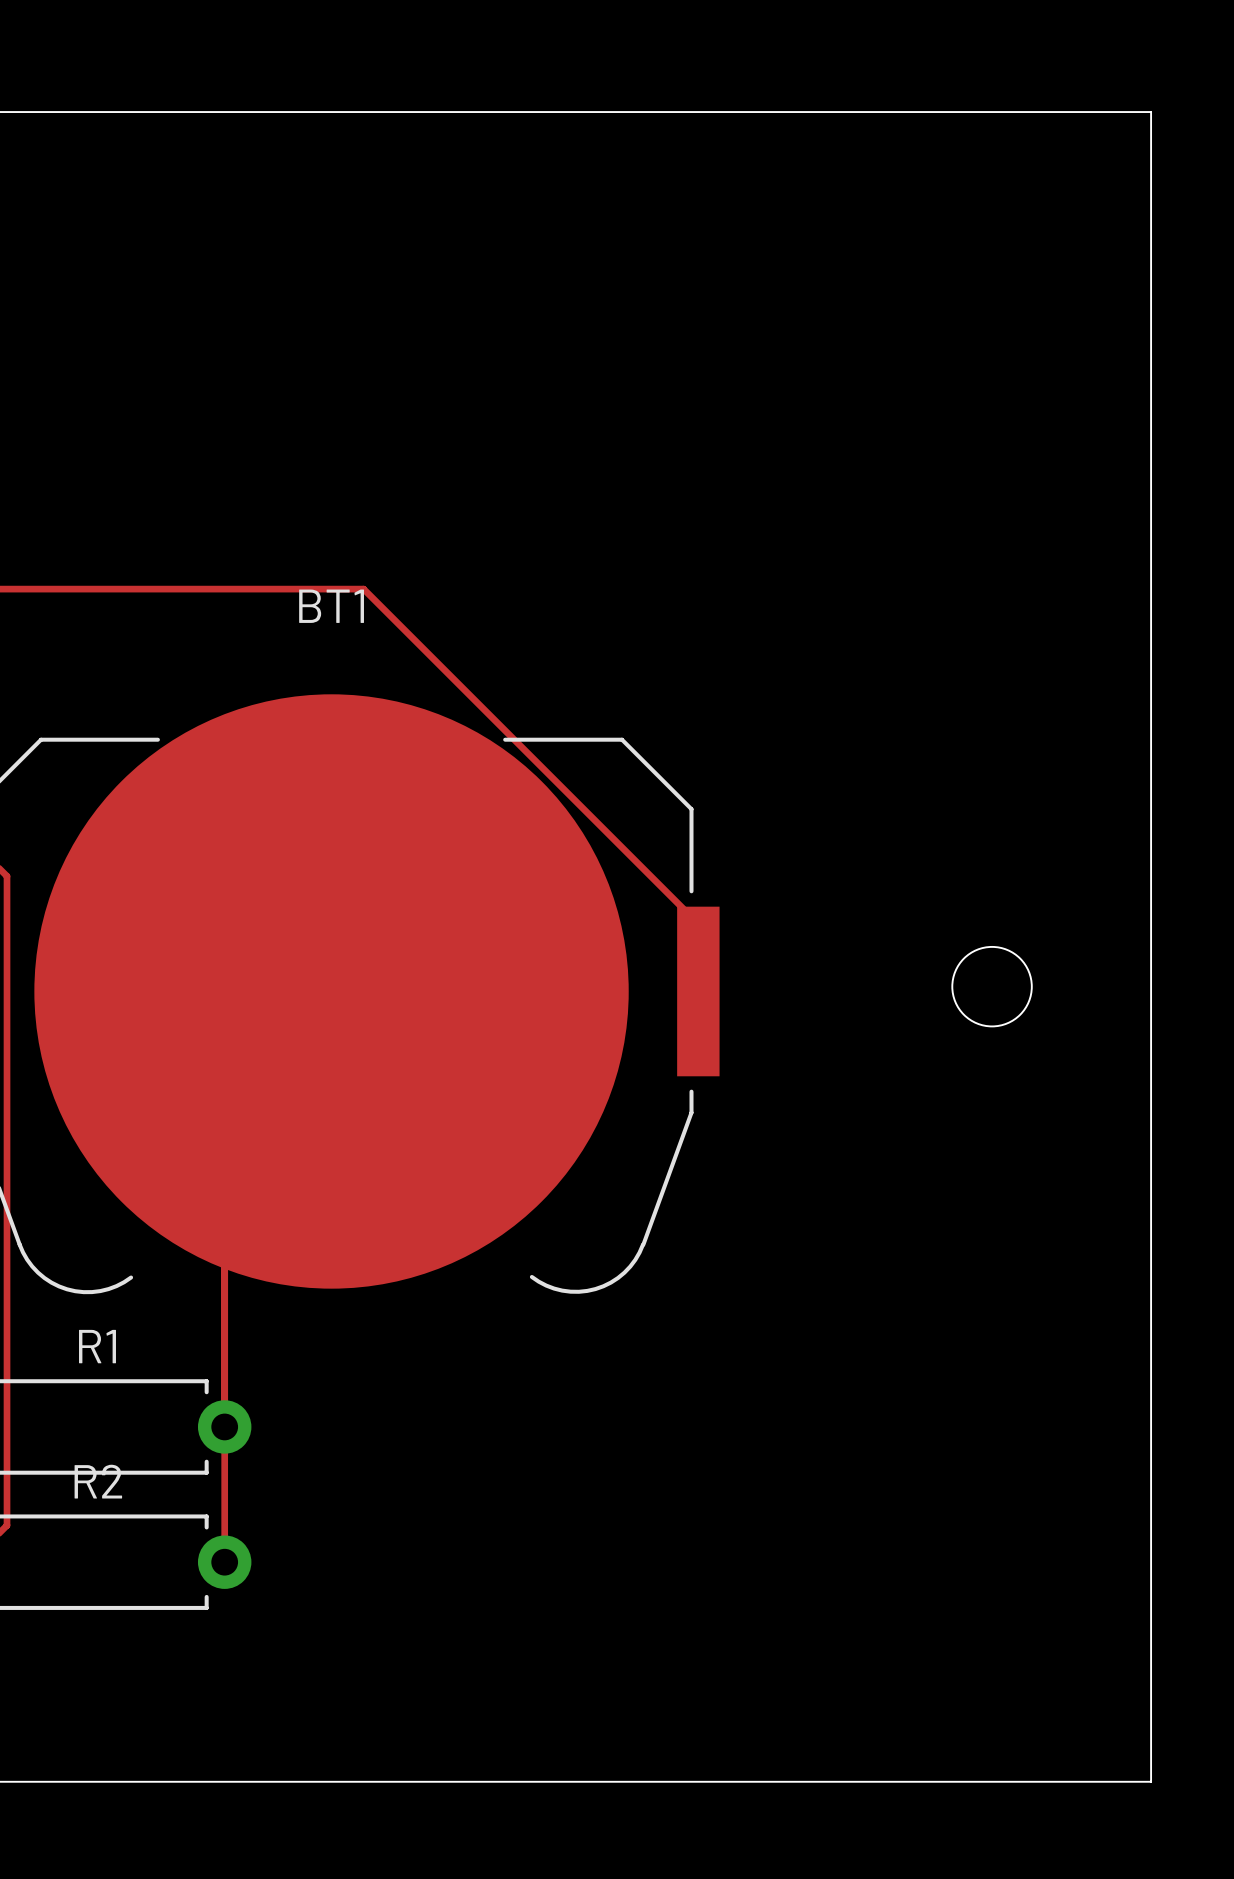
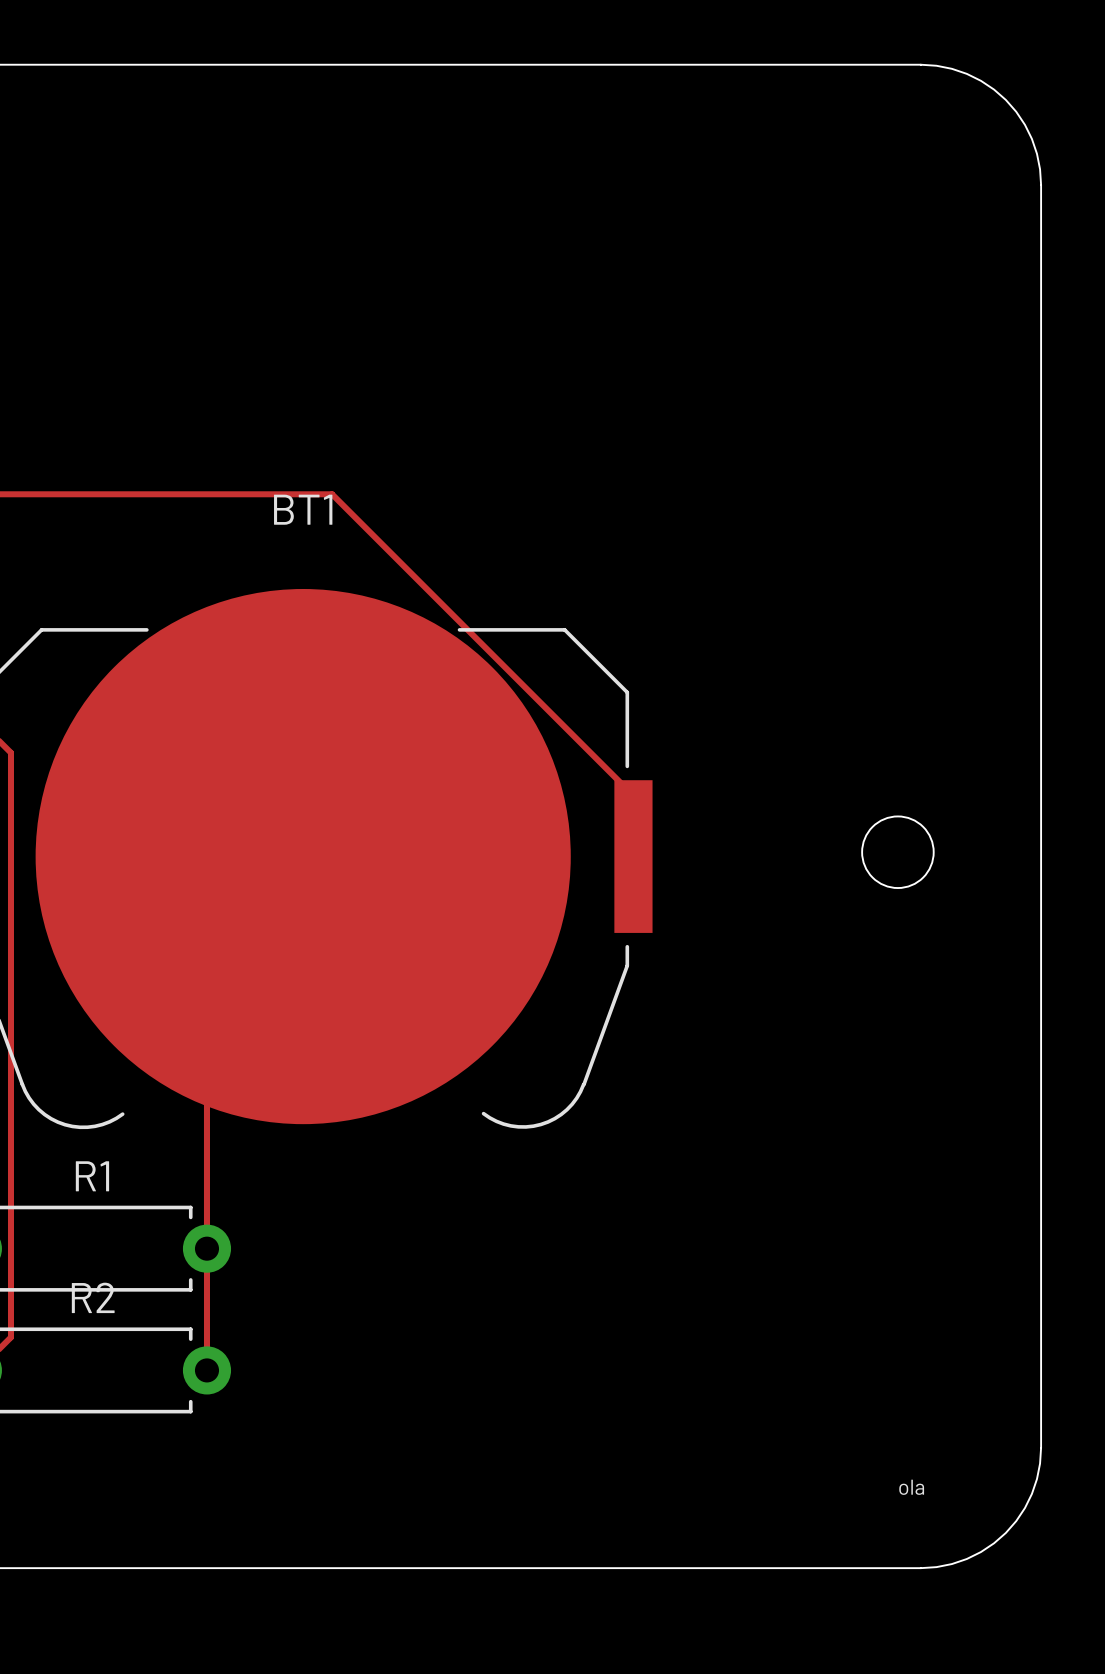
board edge: (1017, 112) (1151, 112) (1151, 245) -> (920, 64) (951, 68) (966, 73) (980, 80) (1005, 99) (1016, 111) (1031, 138) (1036, 153) (1041, 184)
board edge: (1151, 1648) (1151, 1781) (1017, 1781) -> (1041, 1447) (1040, 1463) (1031, 1493) (1024, 1508) (1005, 1532) (980, 1552) (966, 1558) (936, 1567) (920, 1568)
text: none -> ola (911, 1487)

